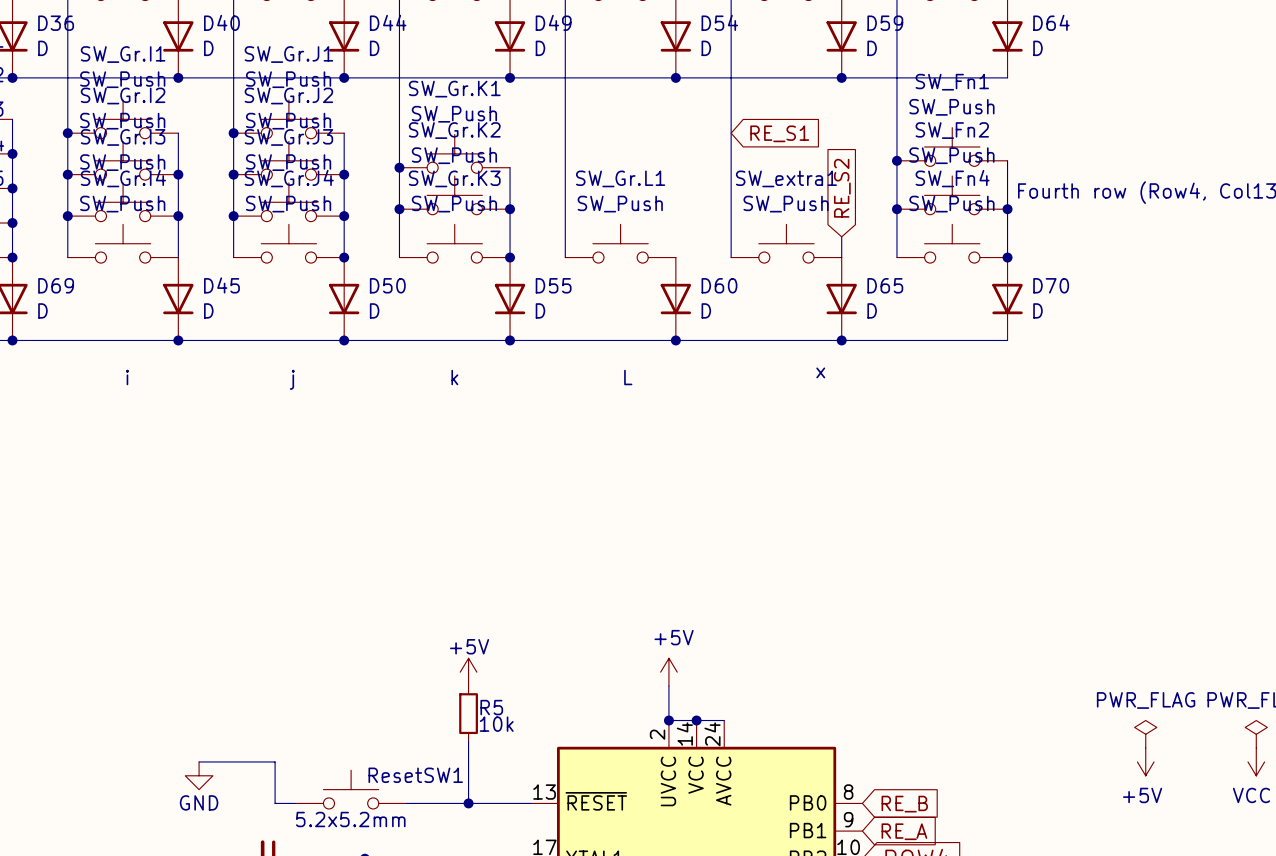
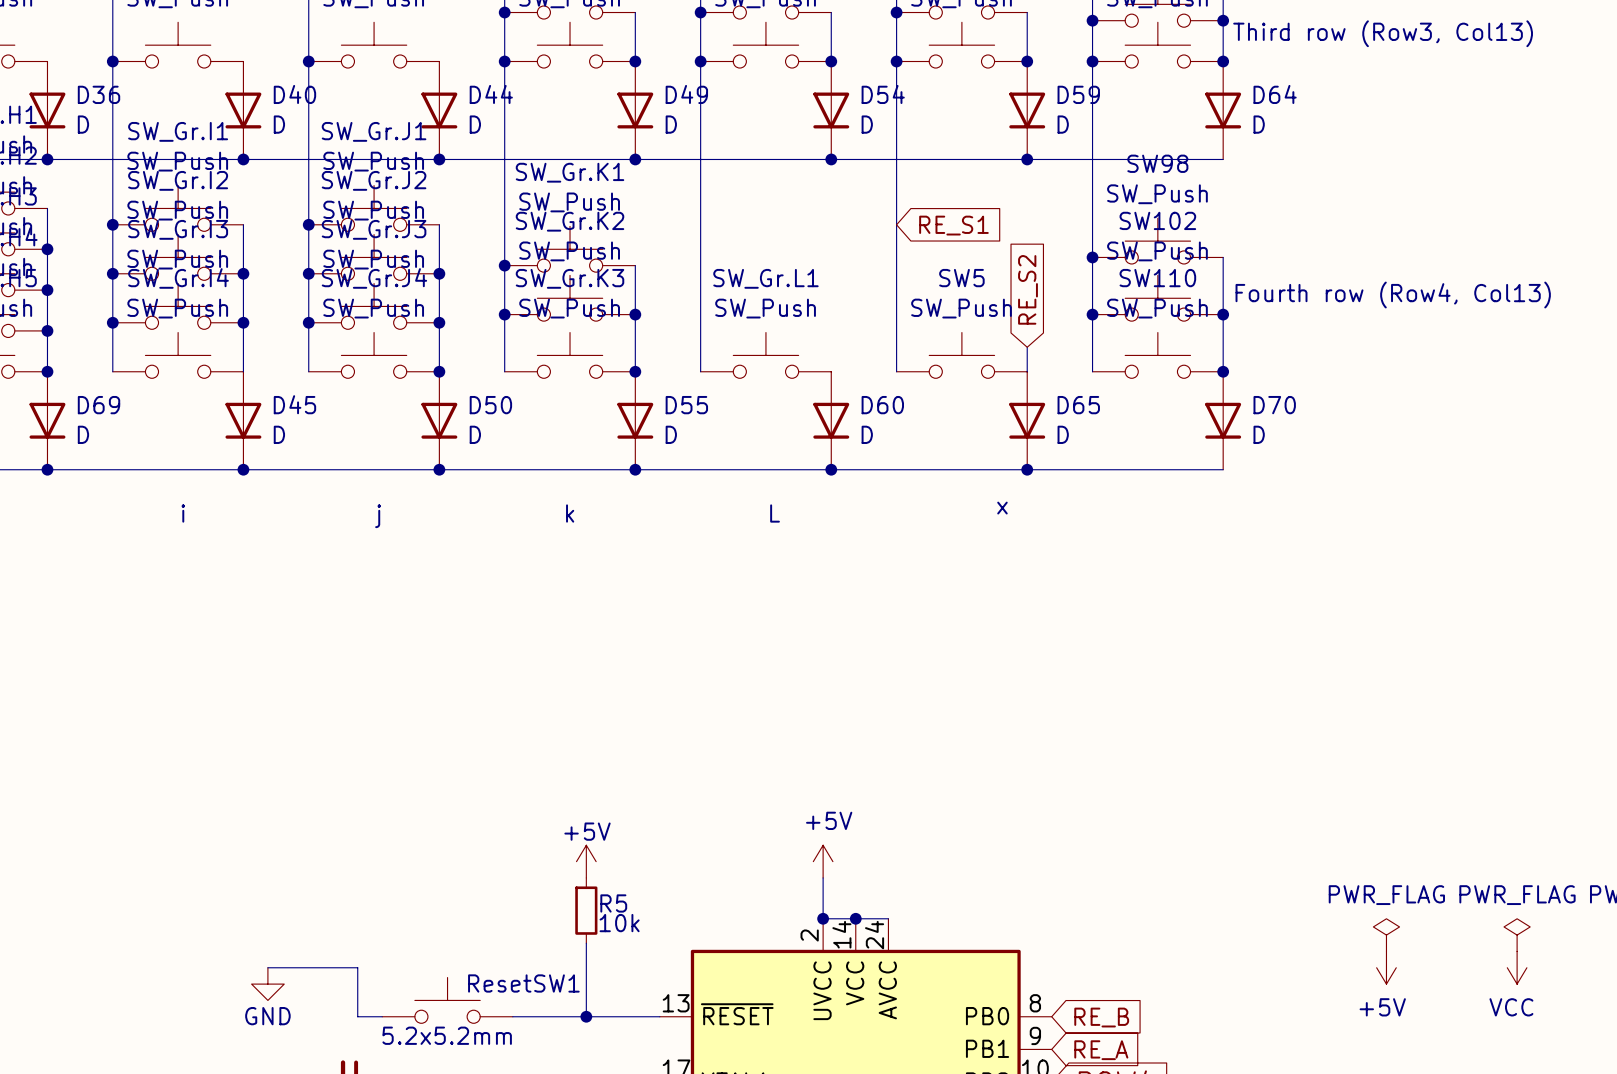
SW_Fn1 name: SW_Fn1 (952, 82) -> SW98 (1157, 163)
SW_Fn2 name: SW_Fn2 (952, 130) -> SW102 (1157, 220)
SW_extra1 name: SW_extra1 (786, 178) -> SW5 (961, 278)
SW_Fn4 name: SW_Fn4 (952, 178) -> SW110 (1157, 278)

